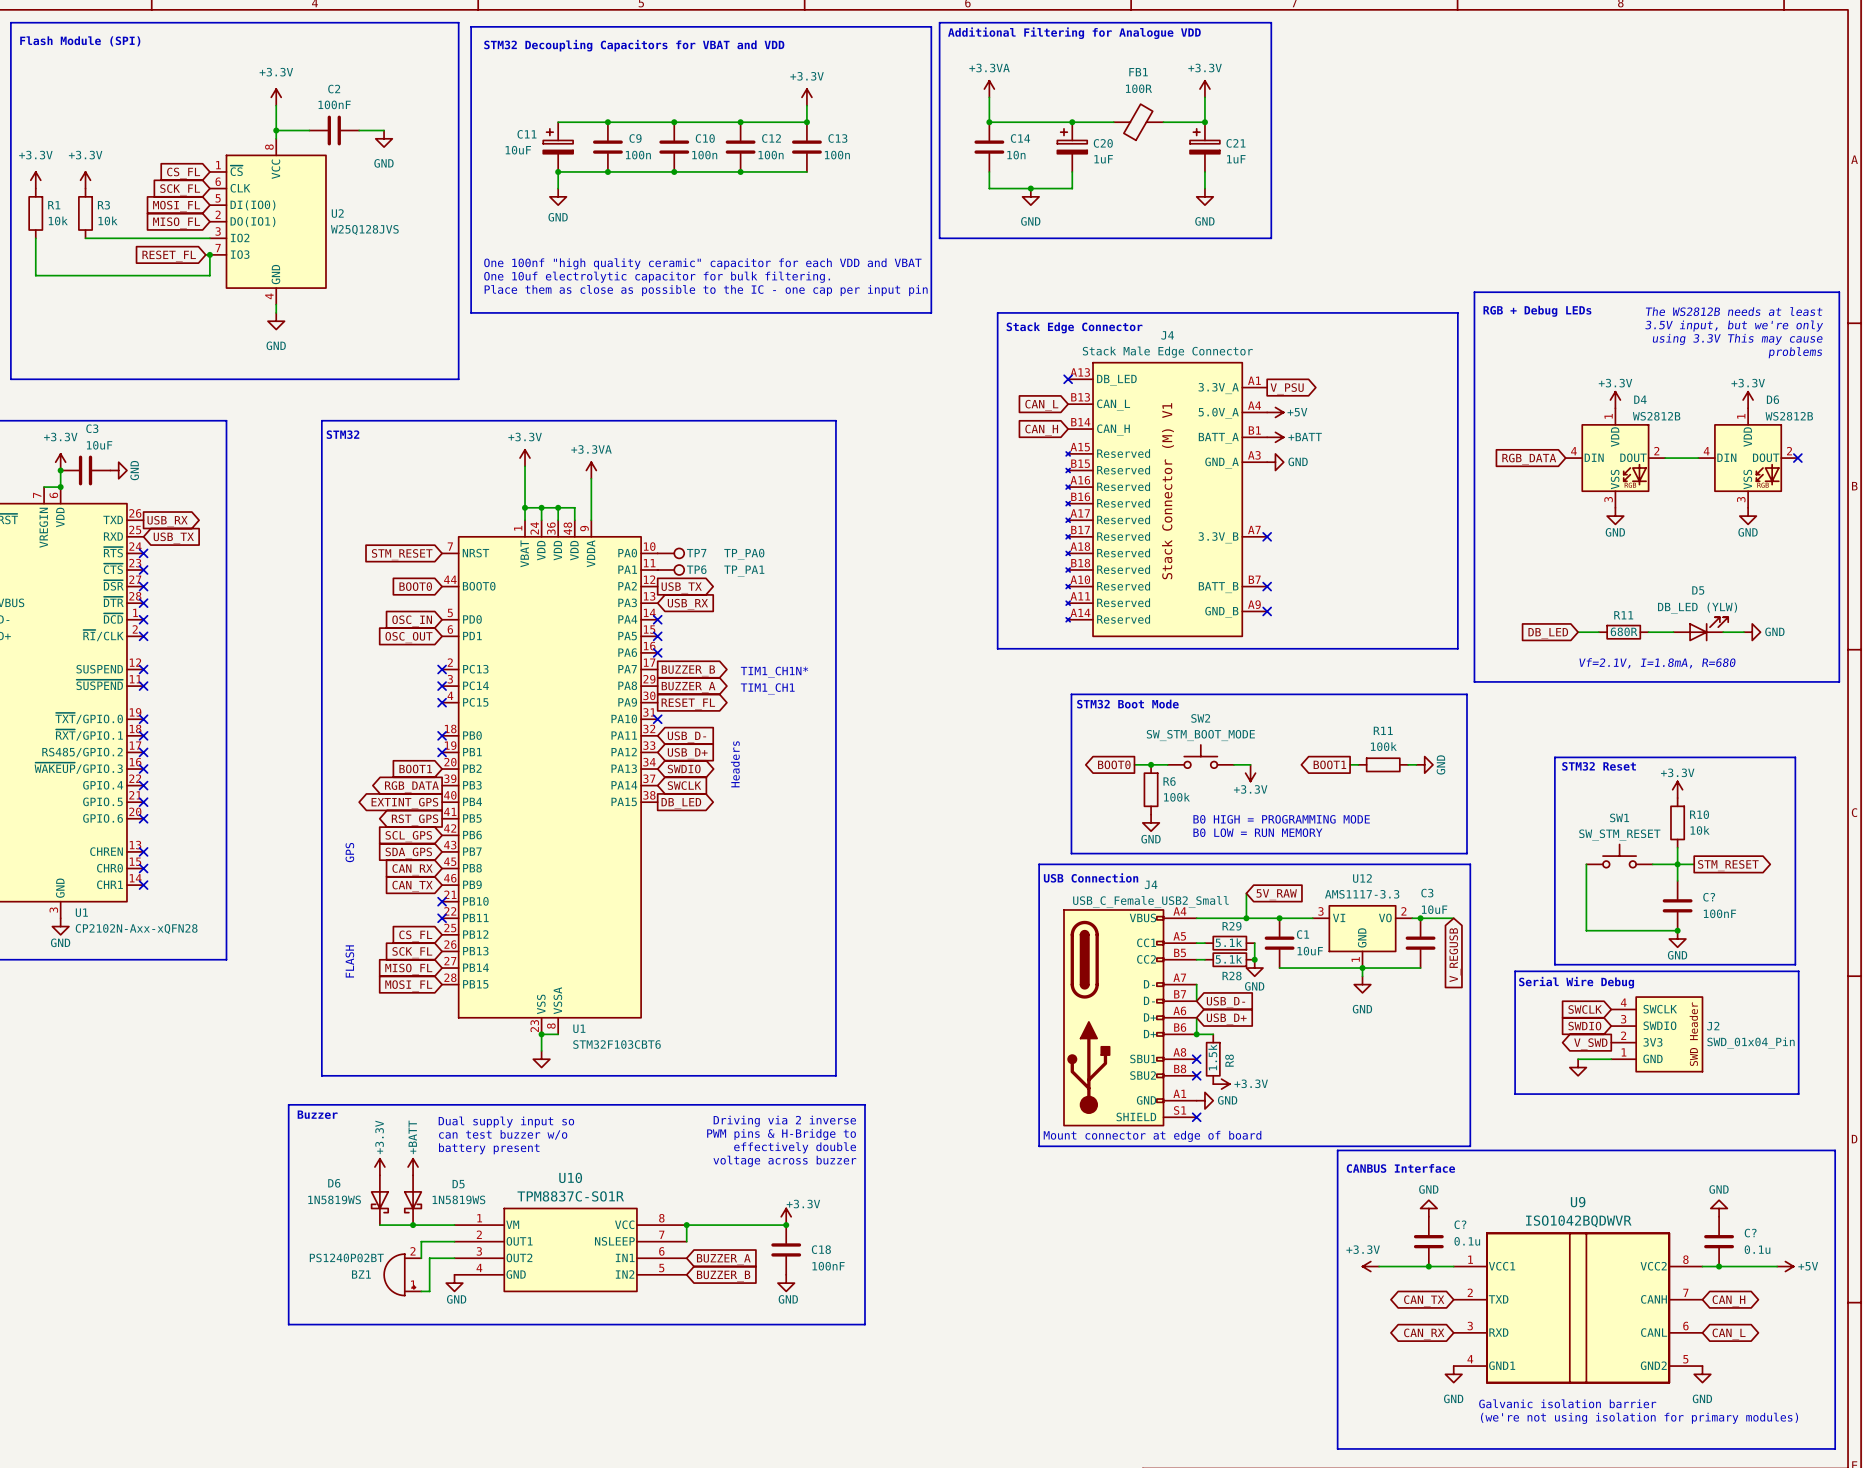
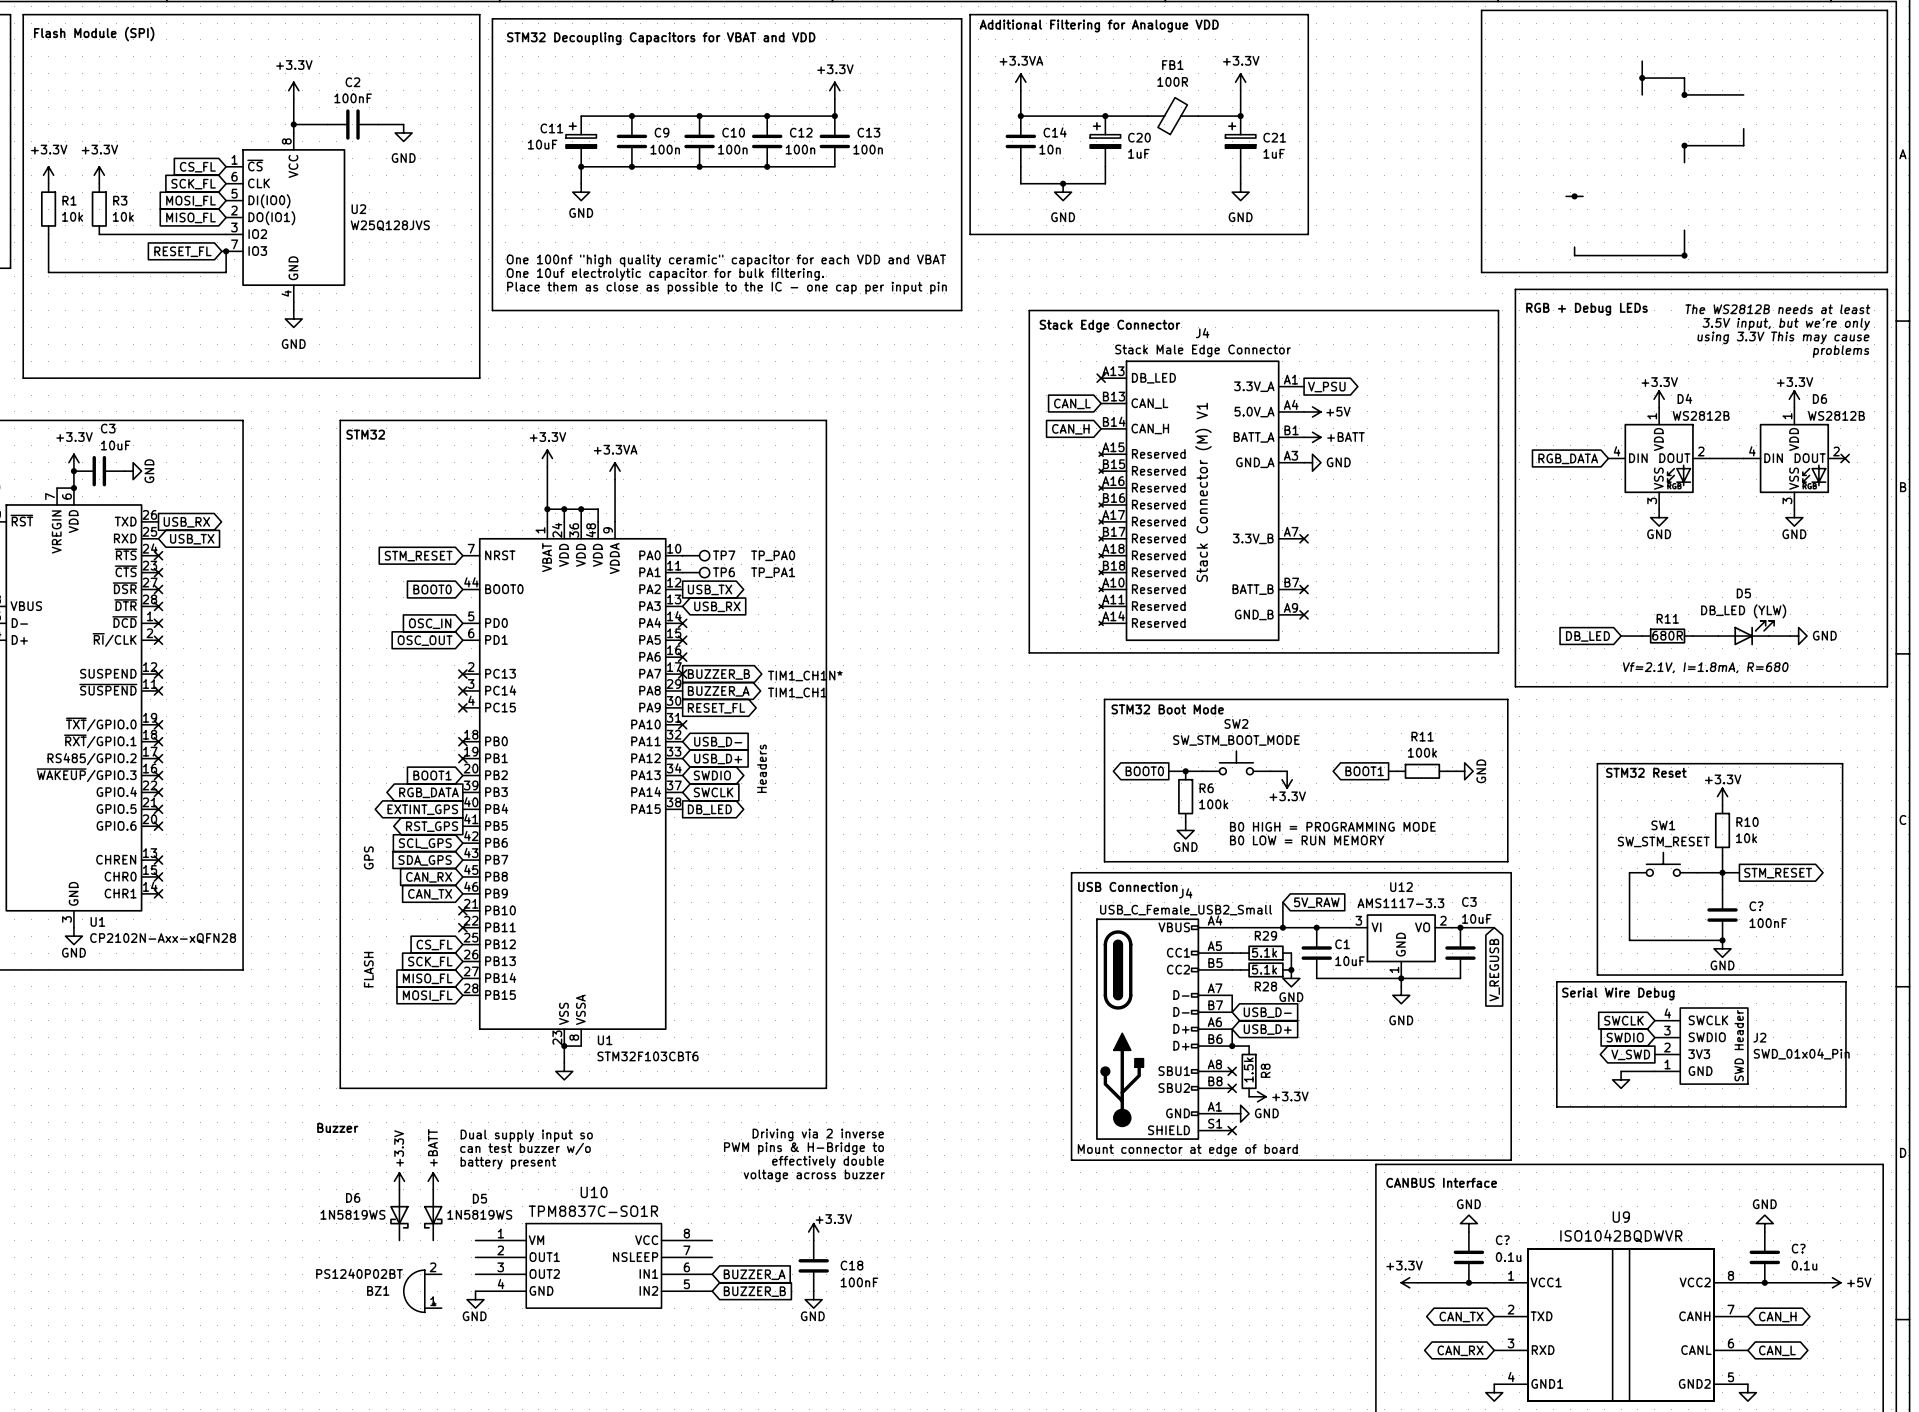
line: none -> (1481, 10) (1887, 10) (1887, 272) (1481, 272) (1481, 10)
wire: none -> (1642, 61) (1642, 94)
wire: none -> (1642, 78) (1684, 78) (1684, 94) (1743, 94)
junction: none -> (1642, 78)
junction: none -> (1684, 94)
wire: none -> (1743, 128) (1743, 145) (1684, 145) (1684, 162)
junction: none -> (1684, 145)
wire: none -> (1566, 196) (1583, 196)
junction: none -> (1574, 196)
wire: none -> (1684, 230) (1684, 255) (1574, 255) (1574, 247)
junction: none -> (1684, 255)
line: (798, 420) (835, 420) (835, 1075) (798, 1075) -> (826, 420) (826, 1088)
no-connect mark: none -> (682, 674)
line: (288, 1104) (864, 1104) (864, 1324) (288, 1324) (288, 1104) -> none
wire: (379, 1225) (454, 1225) -> none
junction: (413, 1225) -> none
junction: (686, 1225) -> none
wire: (786, 1225) (686, 1225) (686, 1241) -> none
junction: (786, 1225) -> none
wire: (454, 1241) (421, 1241) (421, 1258) -> none
wire: (454, 1258) (429, 1258) (429, 1291) (421, 1291) -> none

